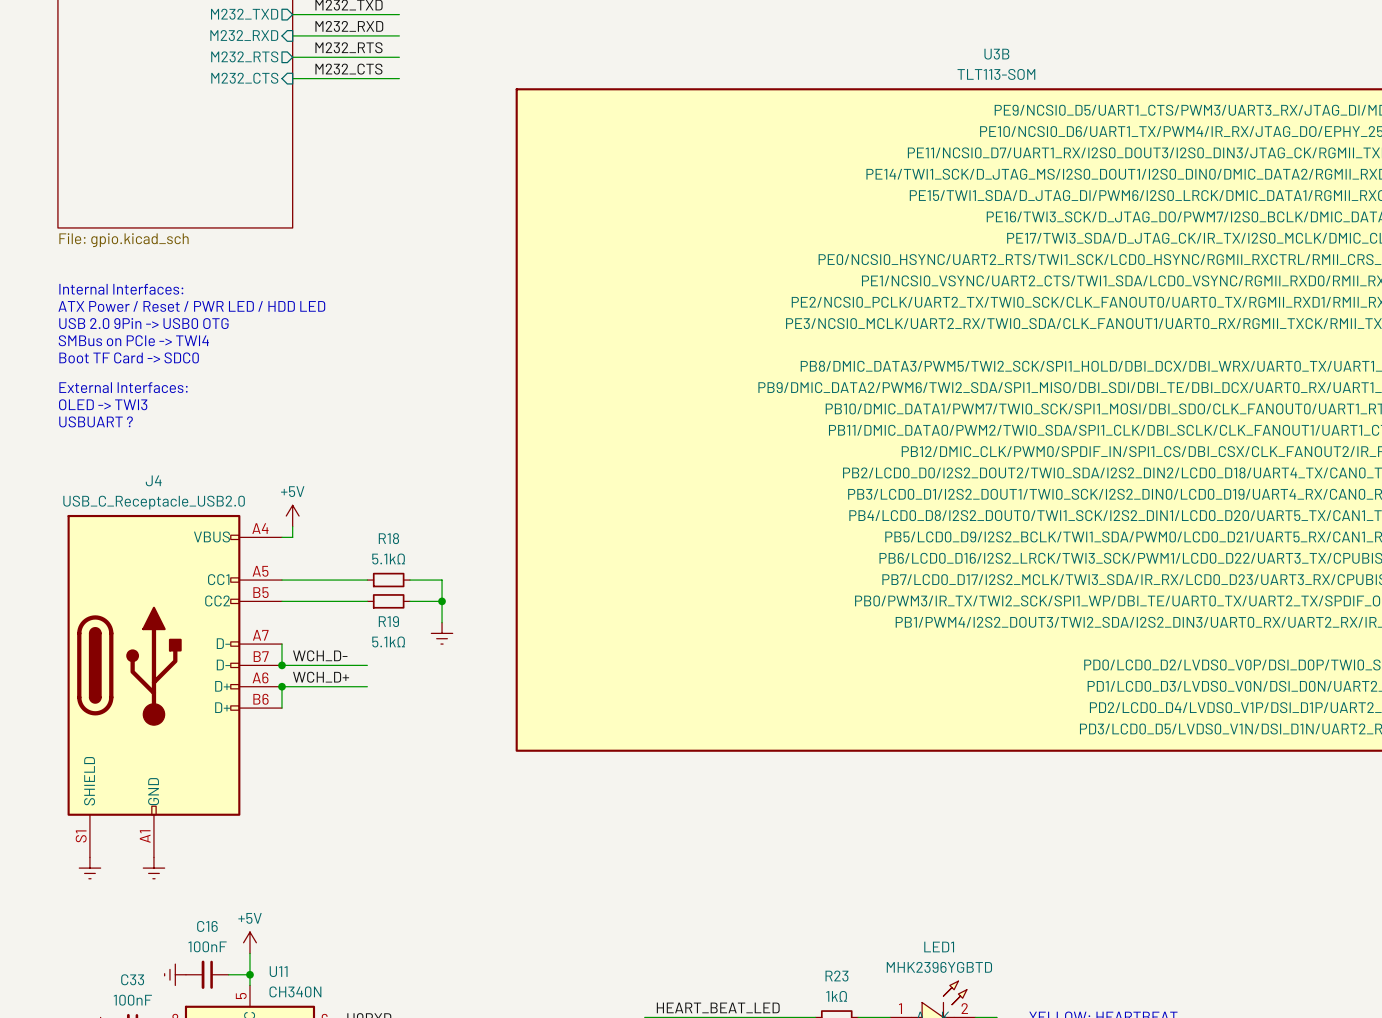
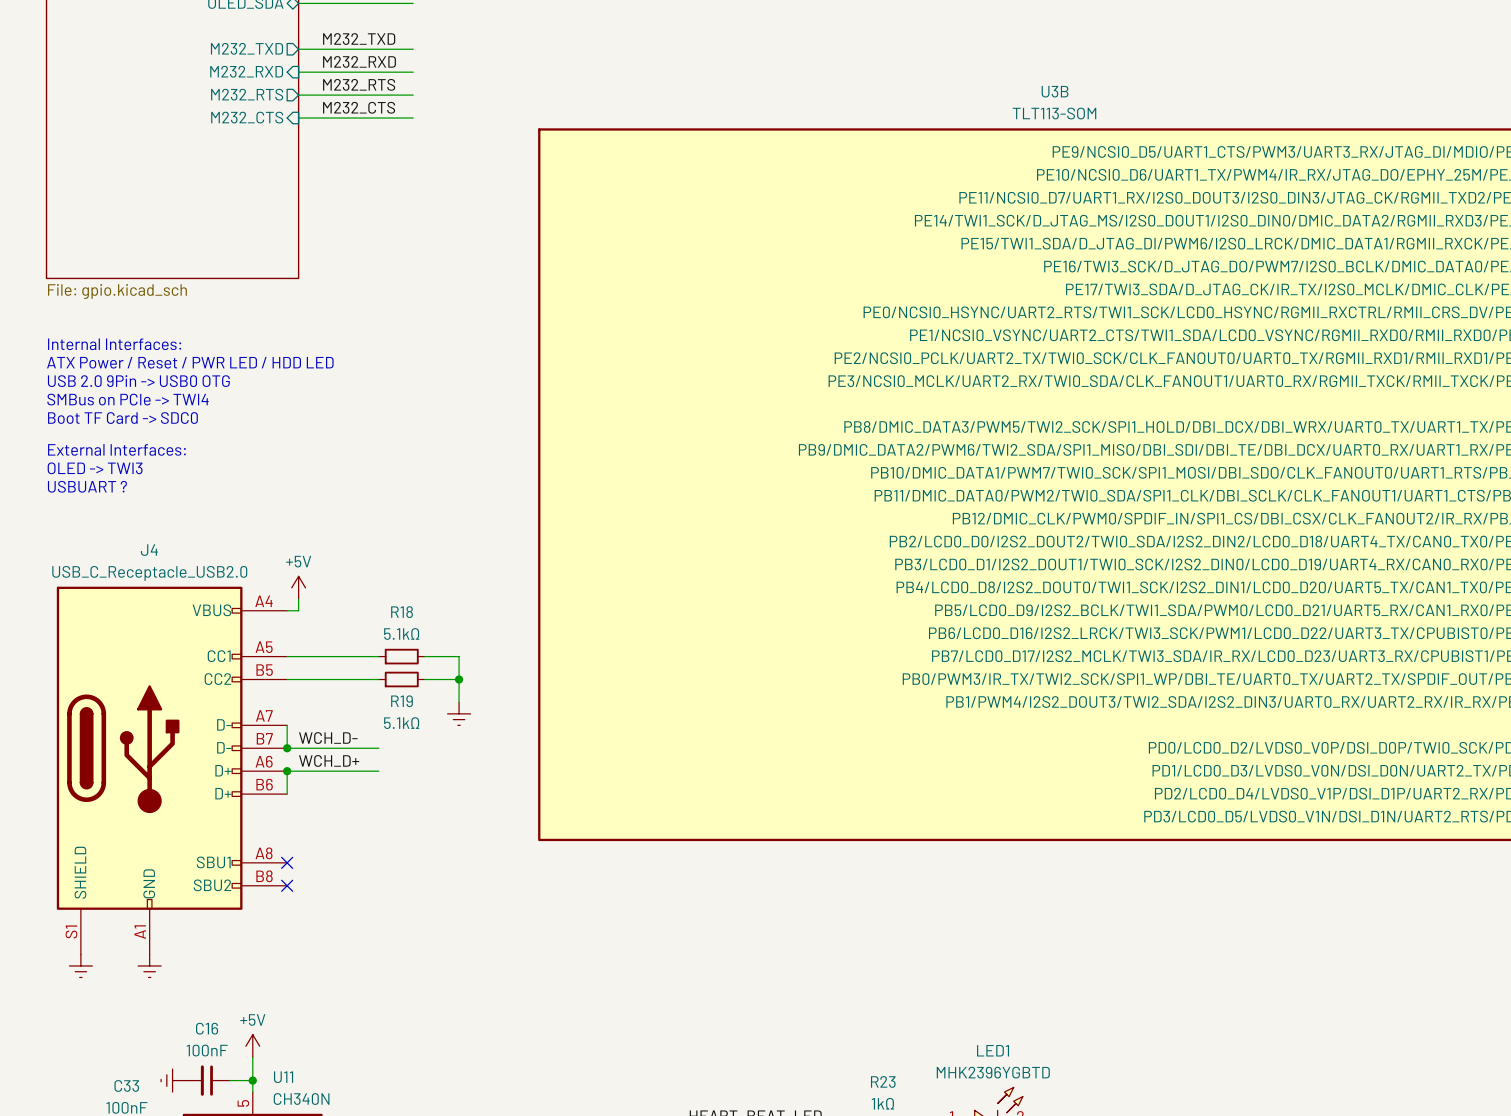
J4 symbol: [67, 514, 282, 858] -> [56, 586, 288, 955]
no-connect mark: none -> (287, 862)
no-connect mark: none -> (287, 885)

